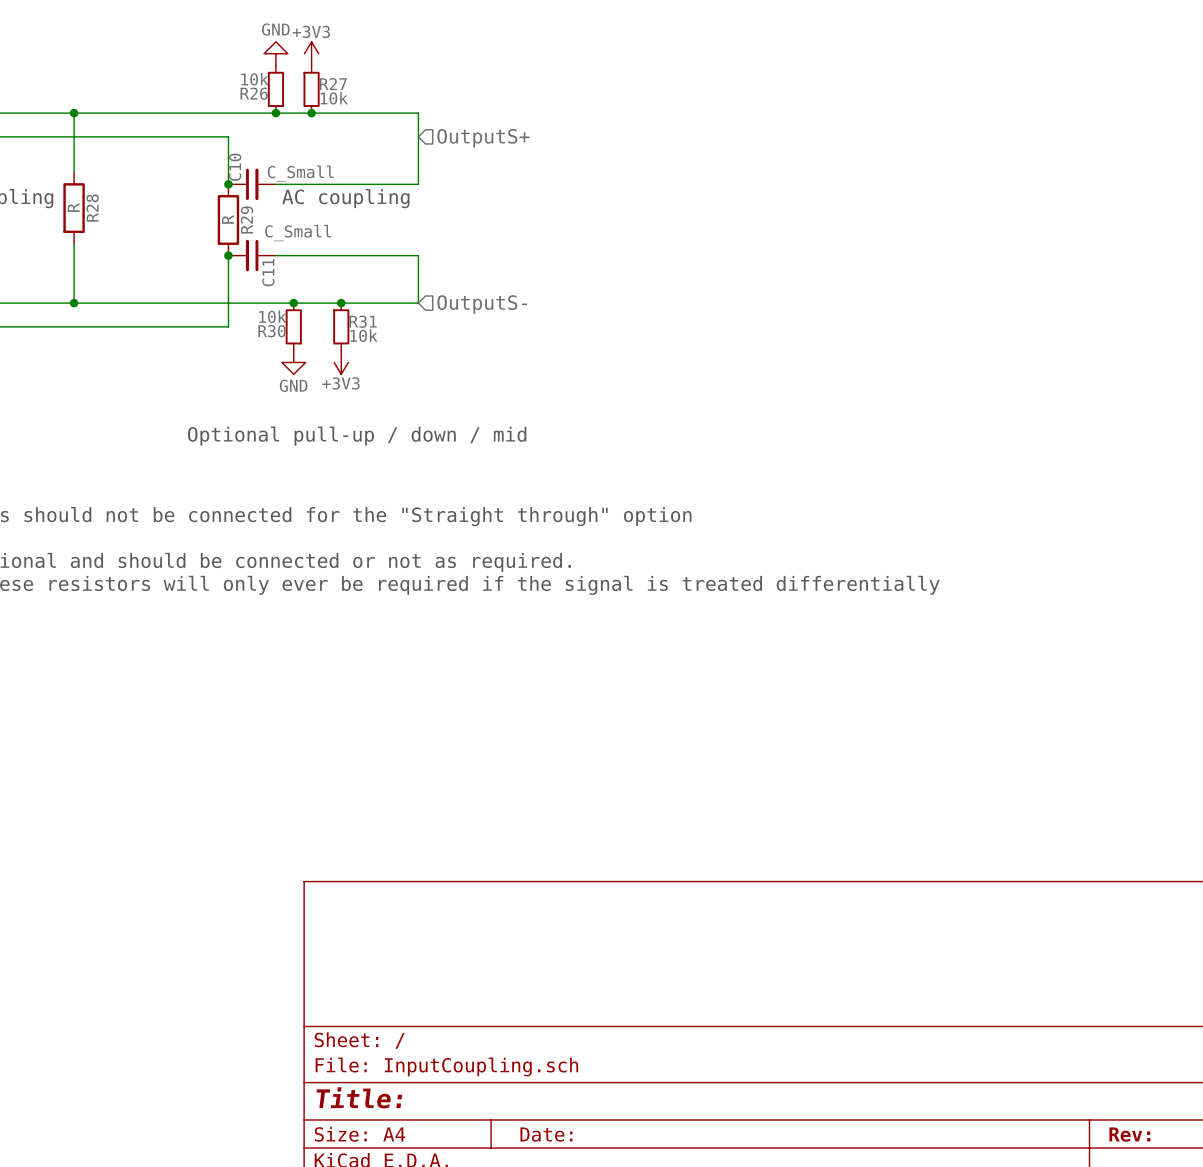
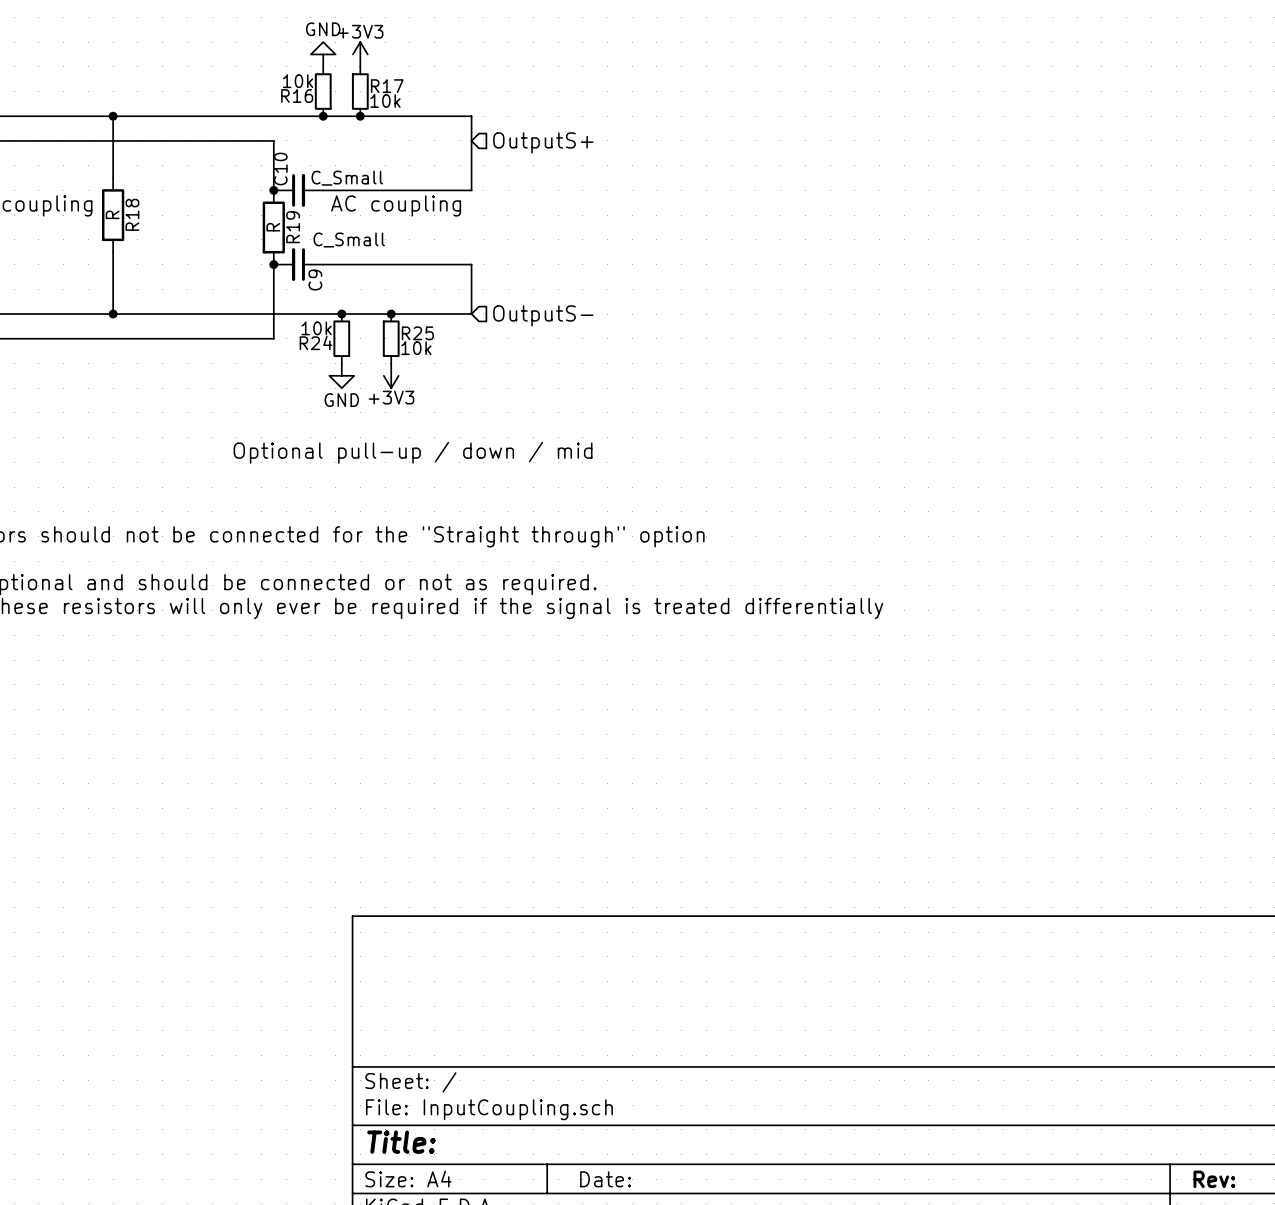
R27 name: R27 (333, 84) -> R17 (387, 86)
R26 name: R26 (254, 93) -> R16 (297, 96)
R28 name: R28 (92, 208) -> R18 (132, 214)
R29 name: R29 (247, 219) -> R19 (293, 227)
C11 name: C11 (268, 272) -> C9 (315, 280)
R31 name: R31 (363, 321) -> R25 (417, 333)
R30 name: R30 (271, 331) -> R24 (316, 342)

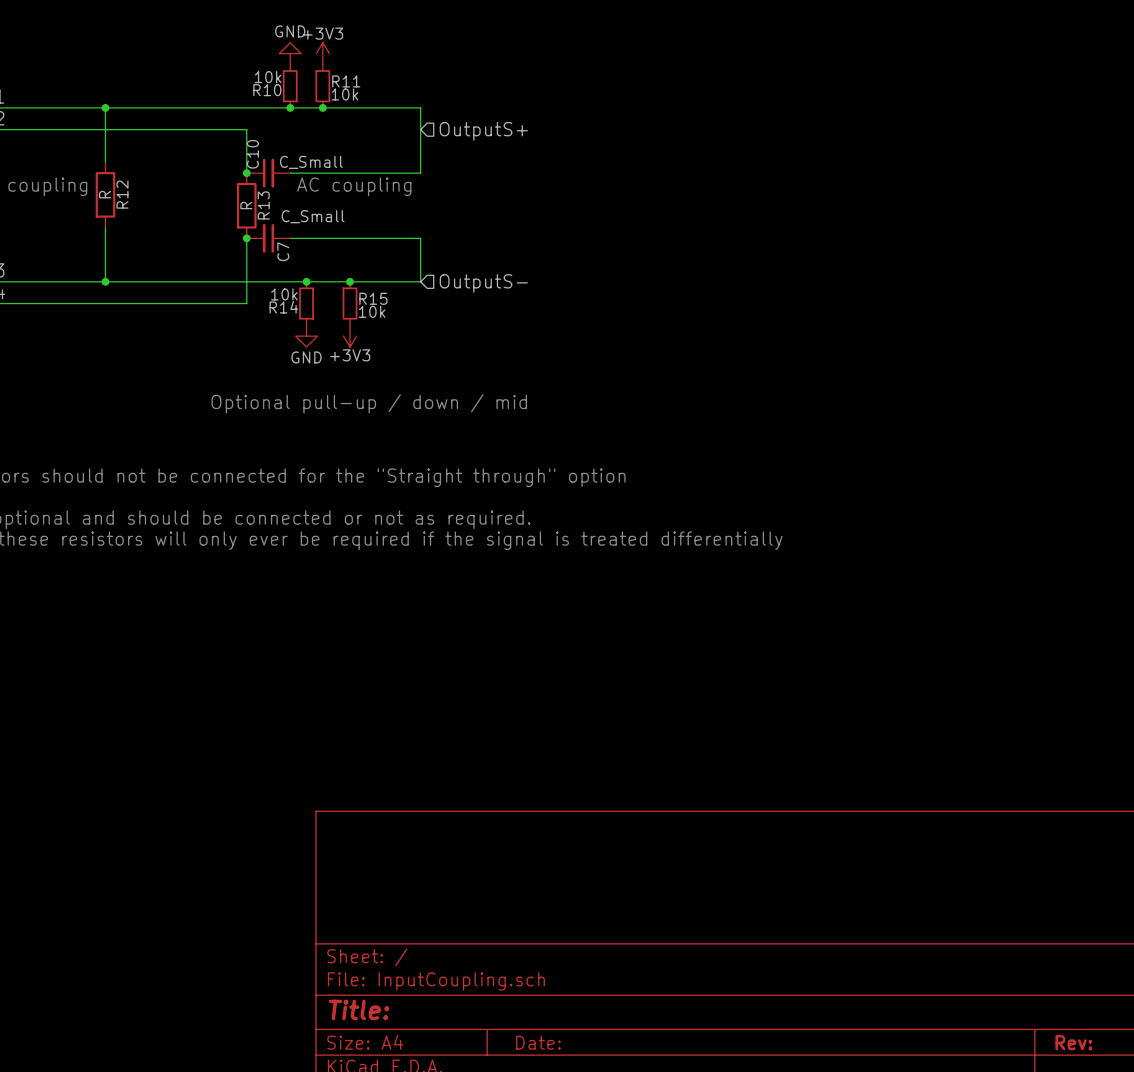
R17 name: R17 (387, 86) -> R11 (346, 81)
R16 name: R16 (297, 96) -> R10 (267, 90)
R18 name: R18 (132, 214) -> R12 (122, 194)
R19 name: R19 (293, 227) -> R13 (263, 205)
C9 name: C9 (315, 280) -> C7 (283, 251)
R25 name: R25 (417, 333) -> R15 (373, 298)
R24 name: R24 (316, 342) -> R14 (283, 307)

